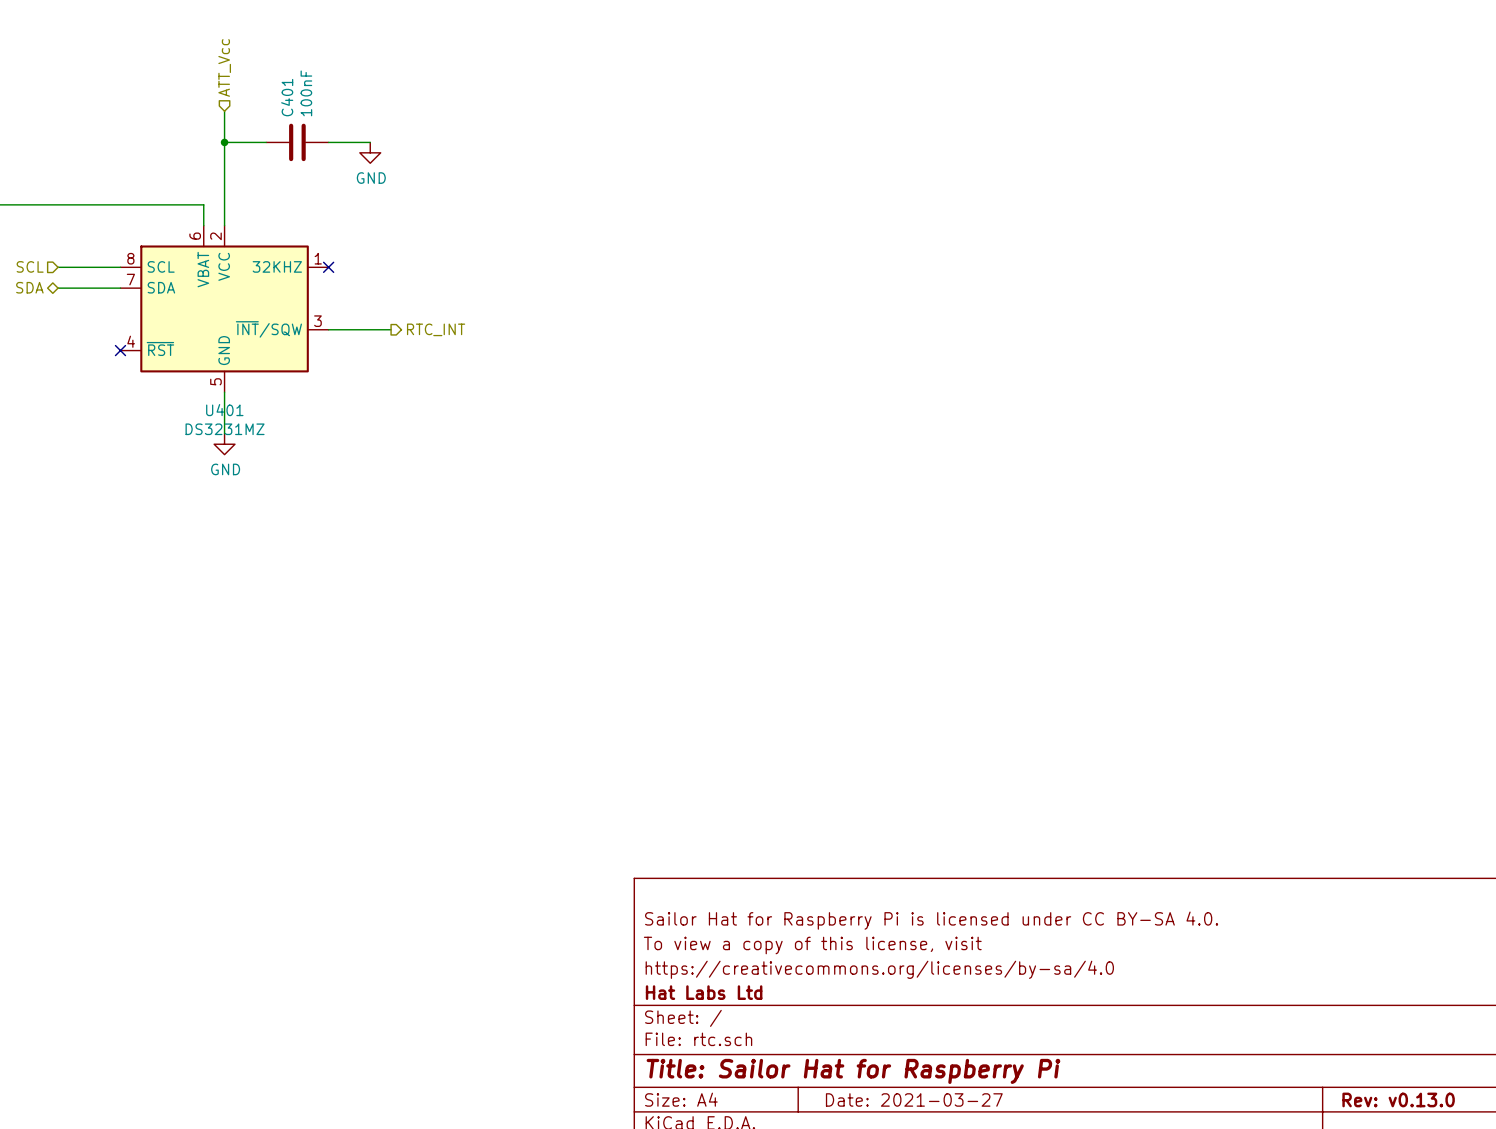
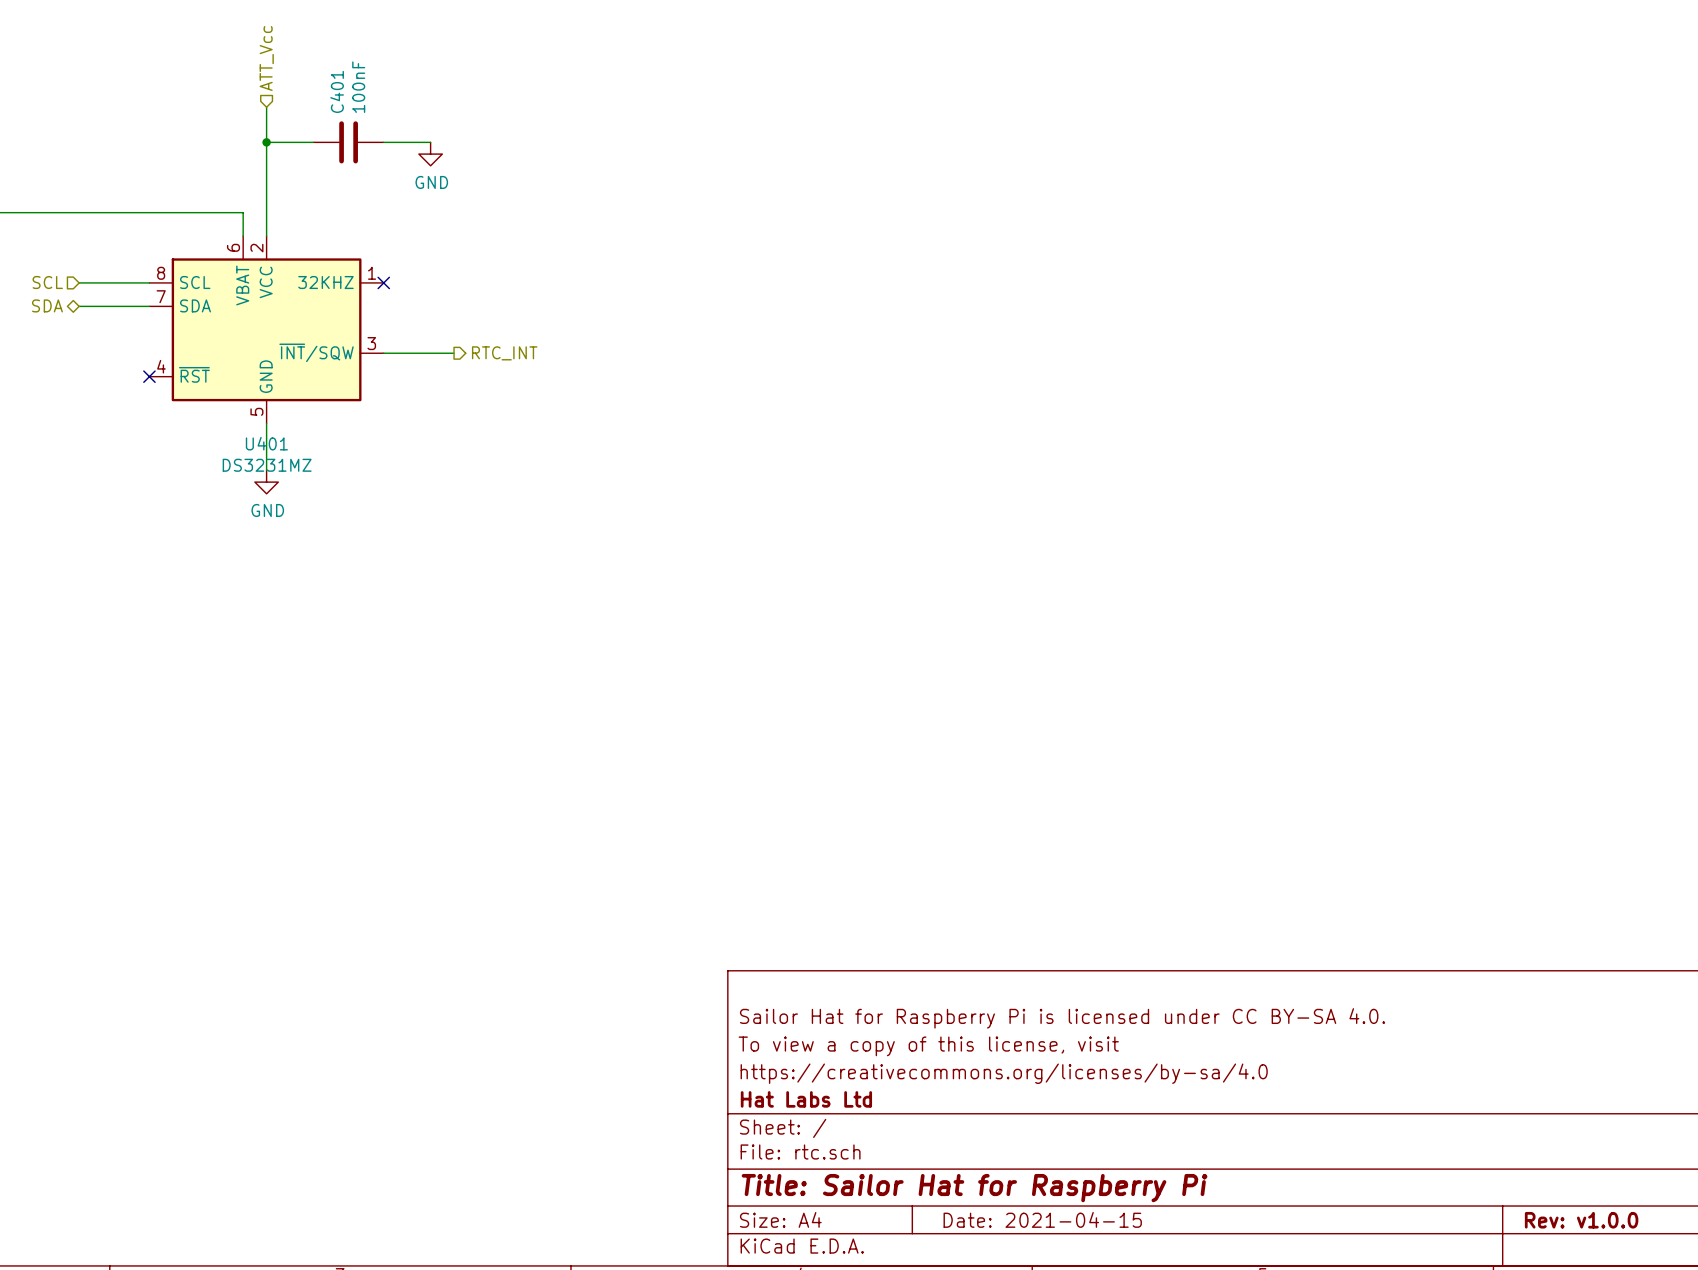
title block: Date: 2021-03-27 (914, 1099) -> Date: 2021-04-15 (1042, 1219)
title block: Rev: v0.13.0 (1398, 1099) -> Rev: v1.0.0 (1581, 1220)

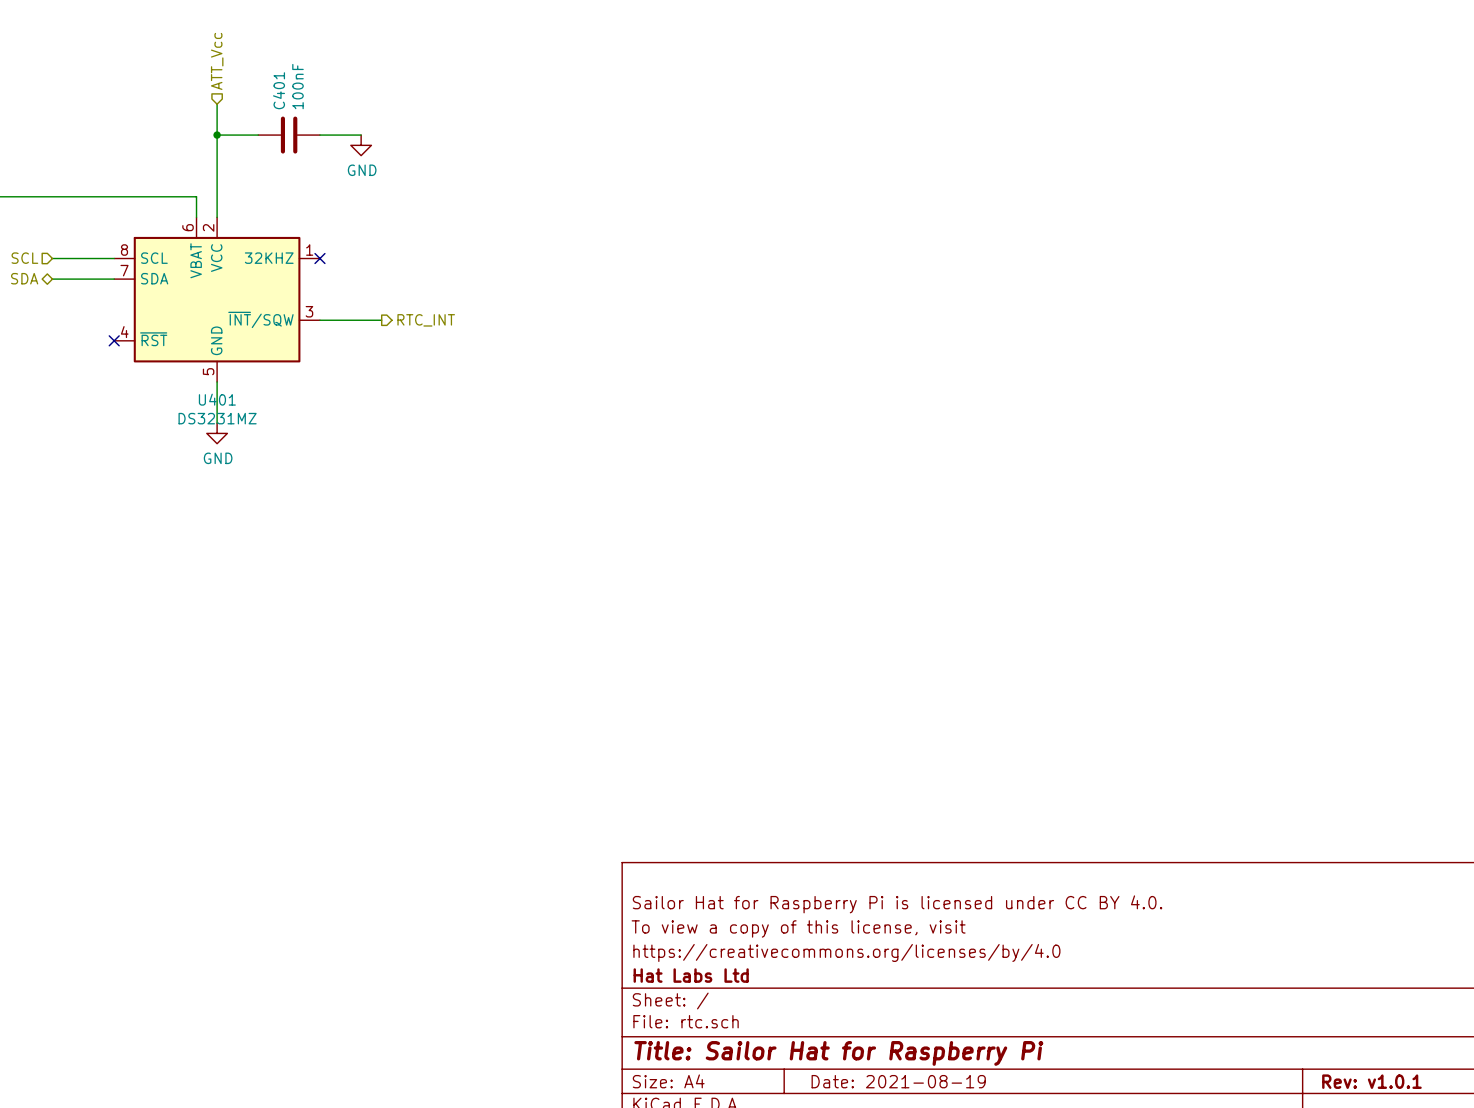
title block: Sailor Hat for Raspberry Pi is licensed under CC BY-SA 4.0. (1062, 1018) -> Sailor Hat for Raspberry Pi is licensed under CC BY 4.0. (897, 904)
title block: https://creativecommons.org/licenses/by-sa/4.0 (1004, 1073) -> https://creativecommons.org/licenses/by/4.0 (846, 952)
title block: Date: 2021-04-15 (1042, 1219) -> Date: 2021-08-19 (898, 1081)
title block: Rev: v1.0.0 (1581, 1220) -> Rev: v1.0.1 (1371, 1081)

